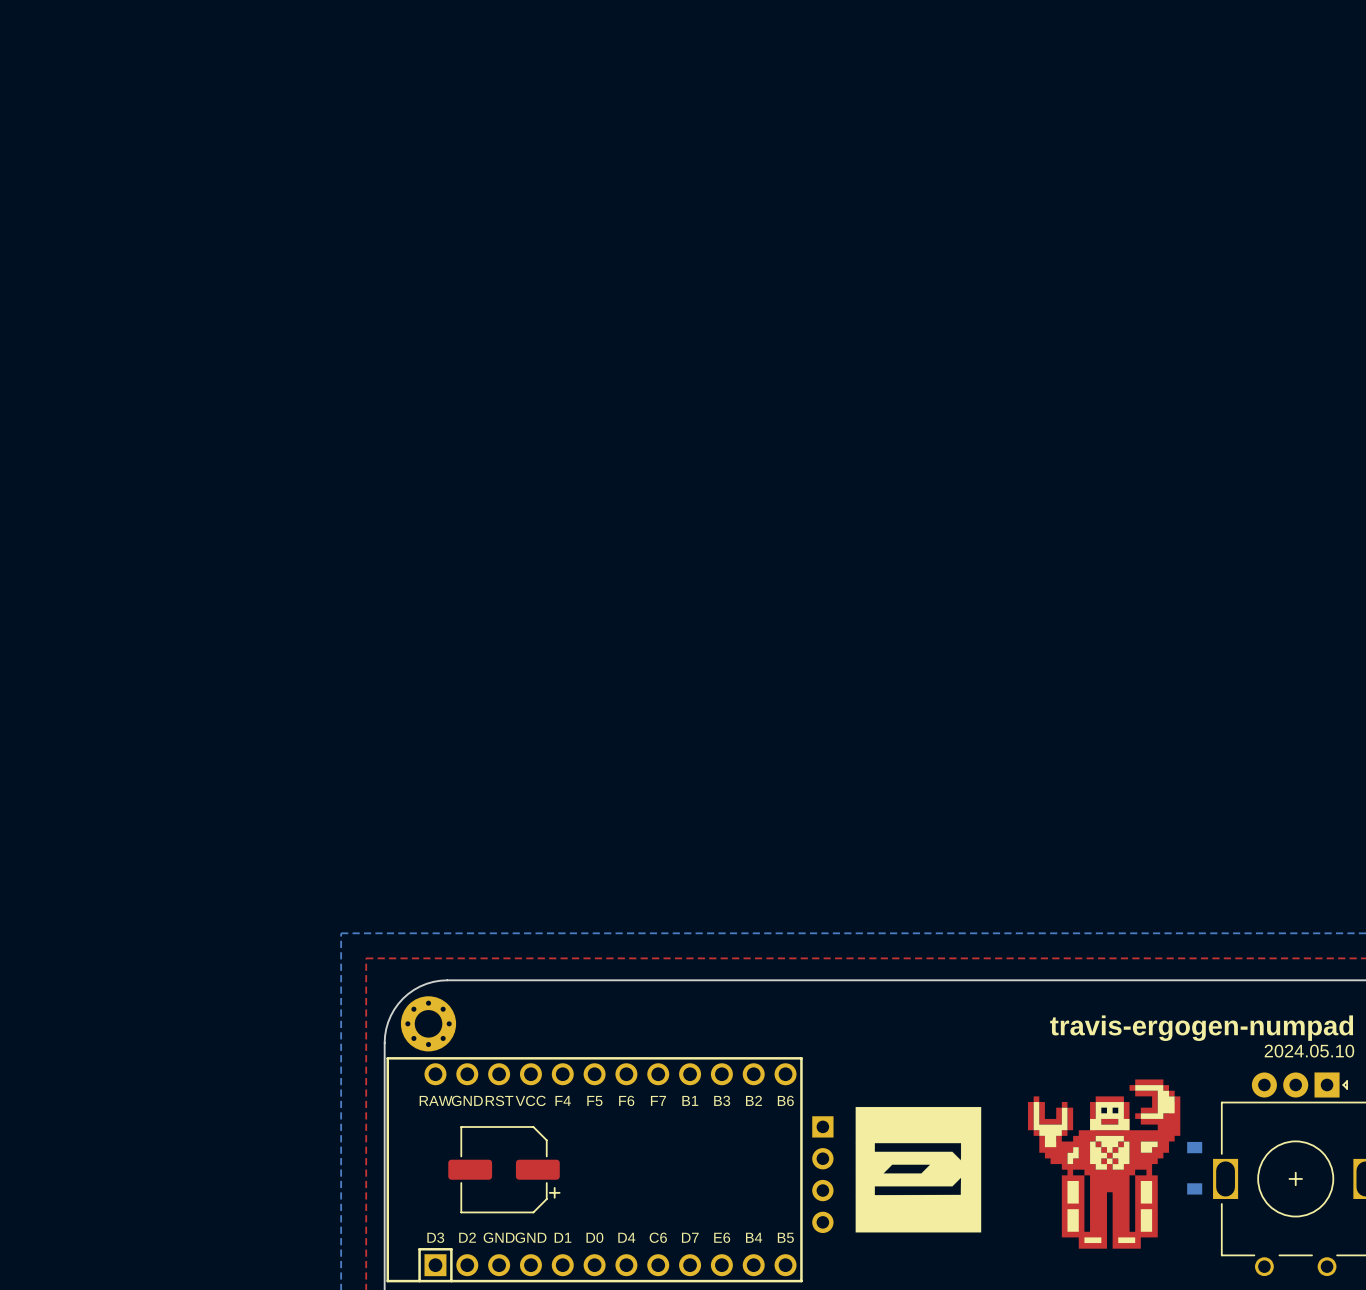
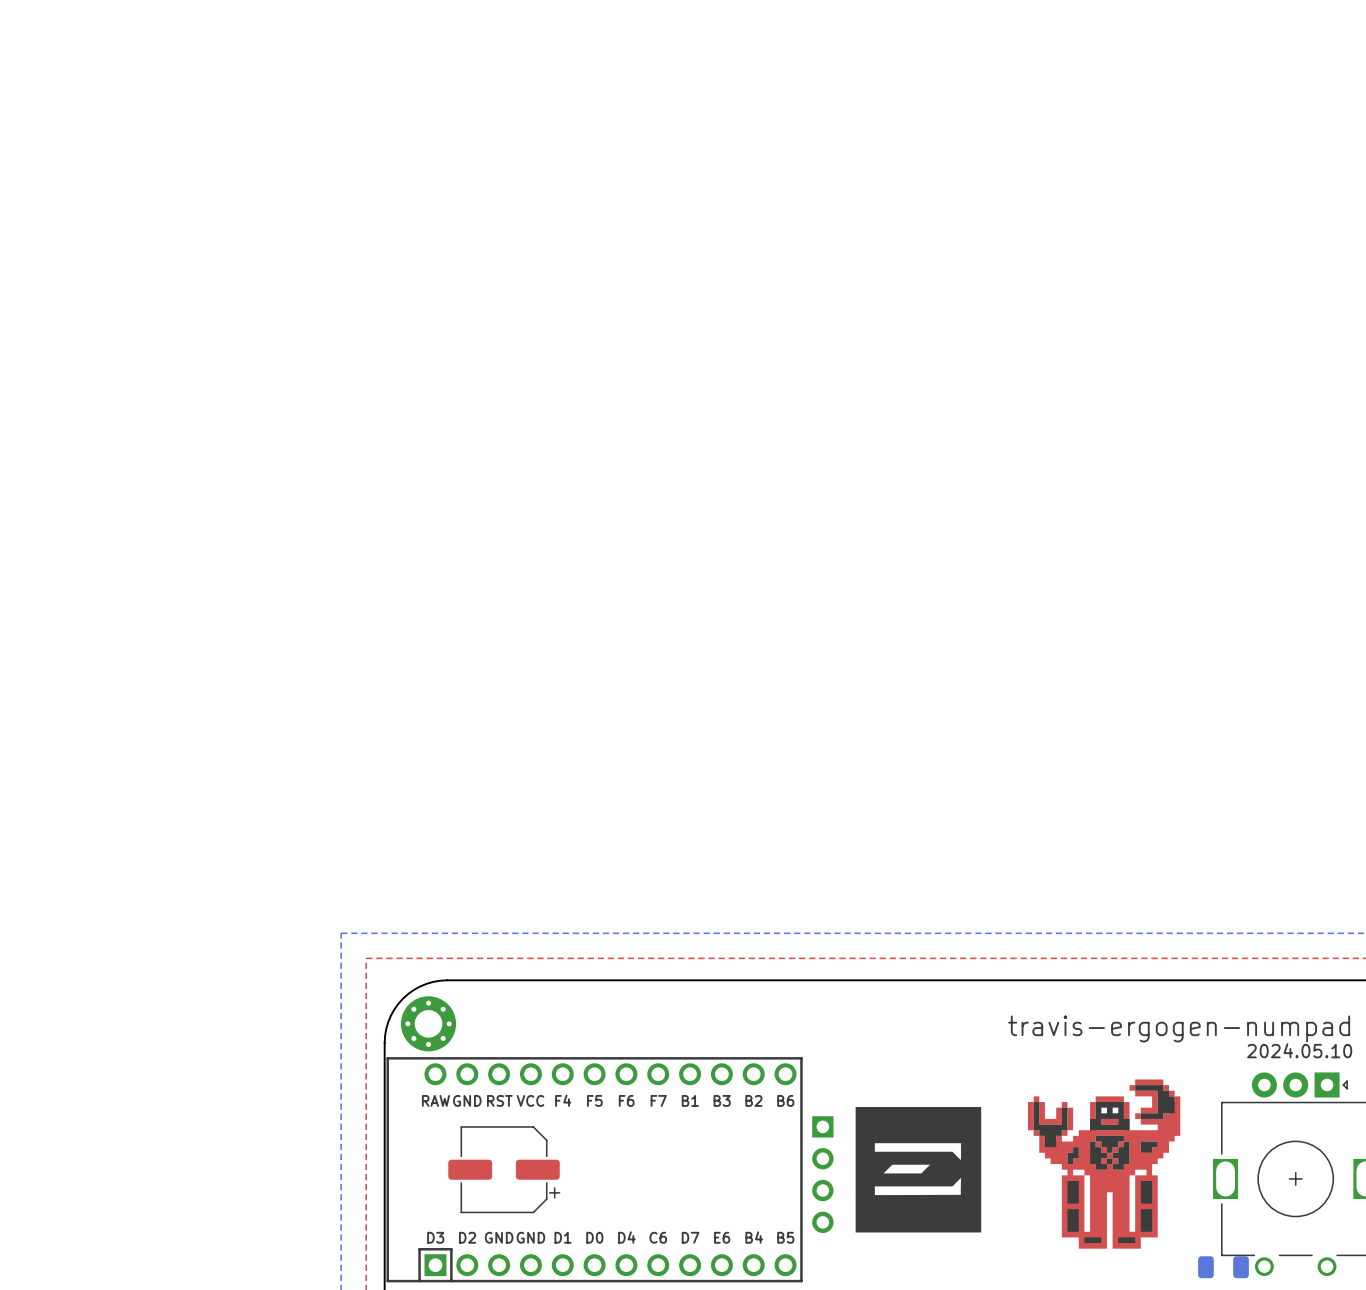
part: (1194, 1168) -> none
part: none -> (1223, 1267)

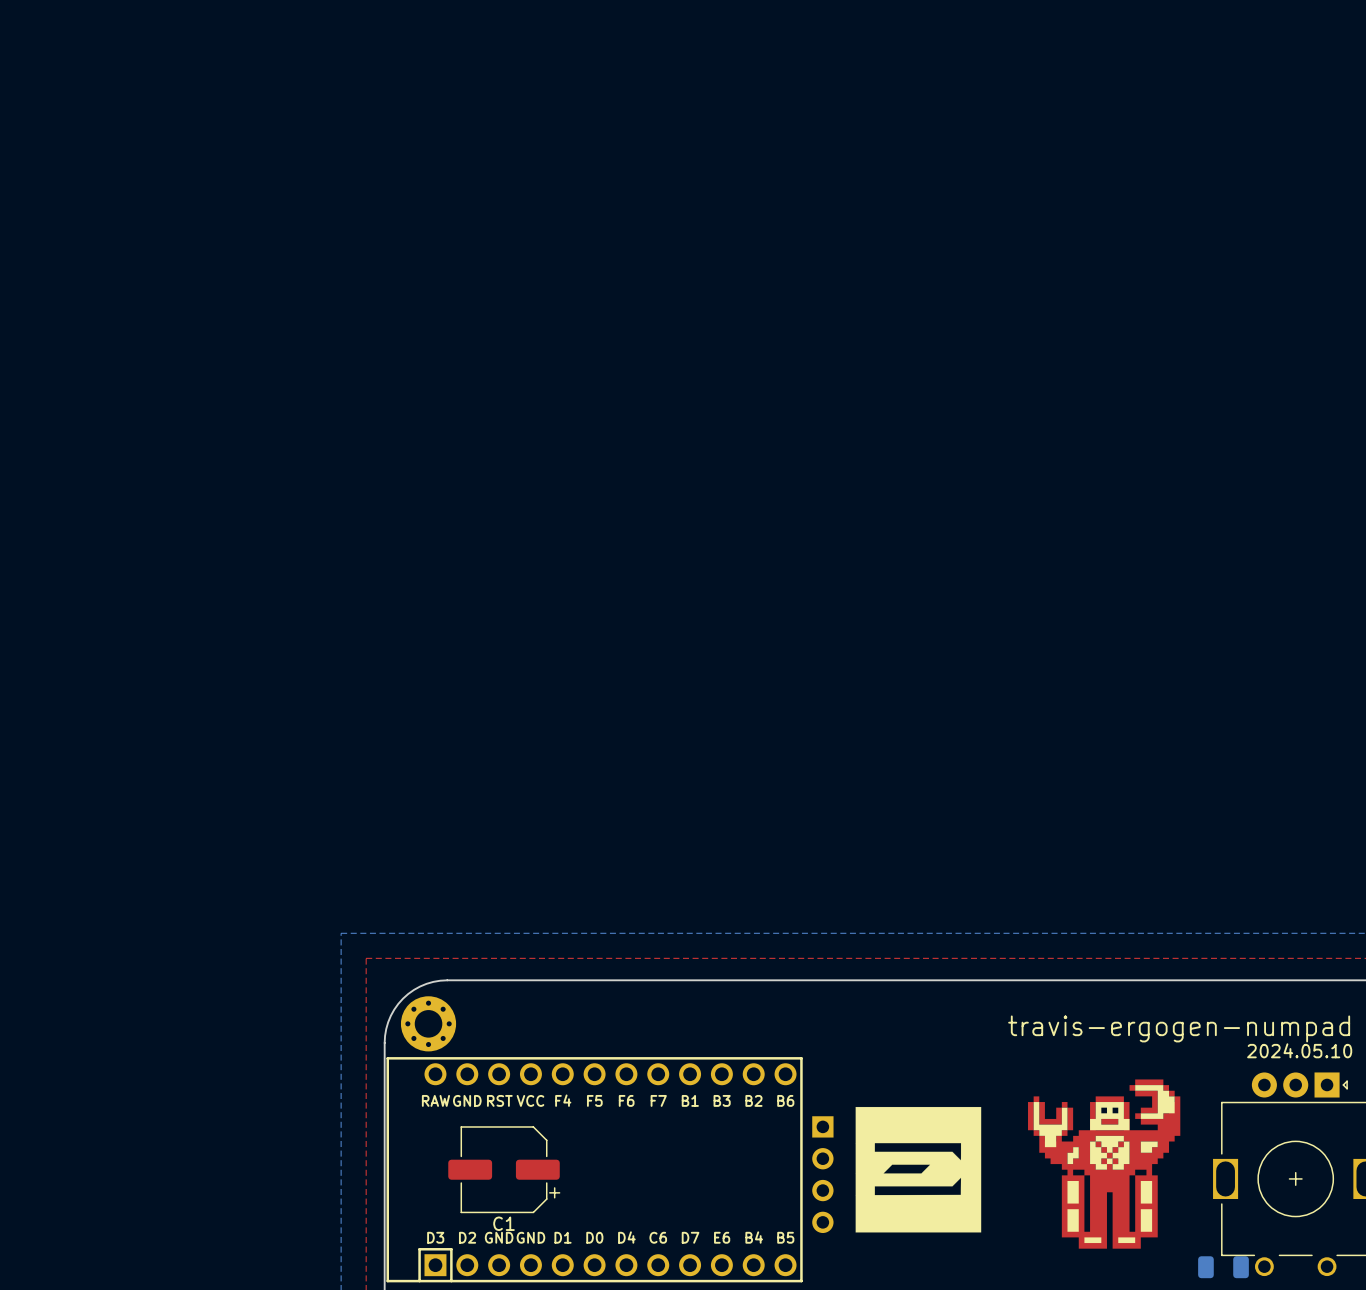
C1 name: none -> C1 (504, 1223)

